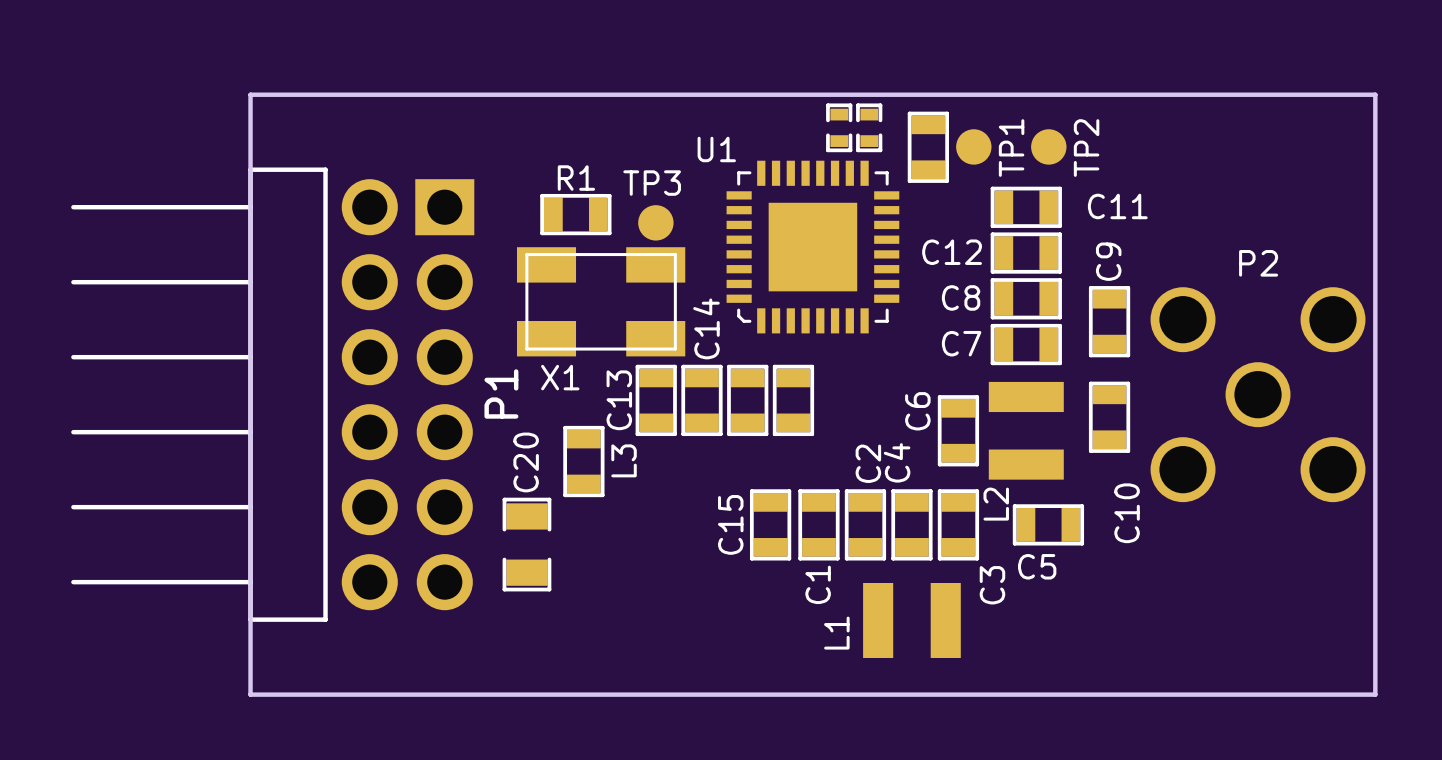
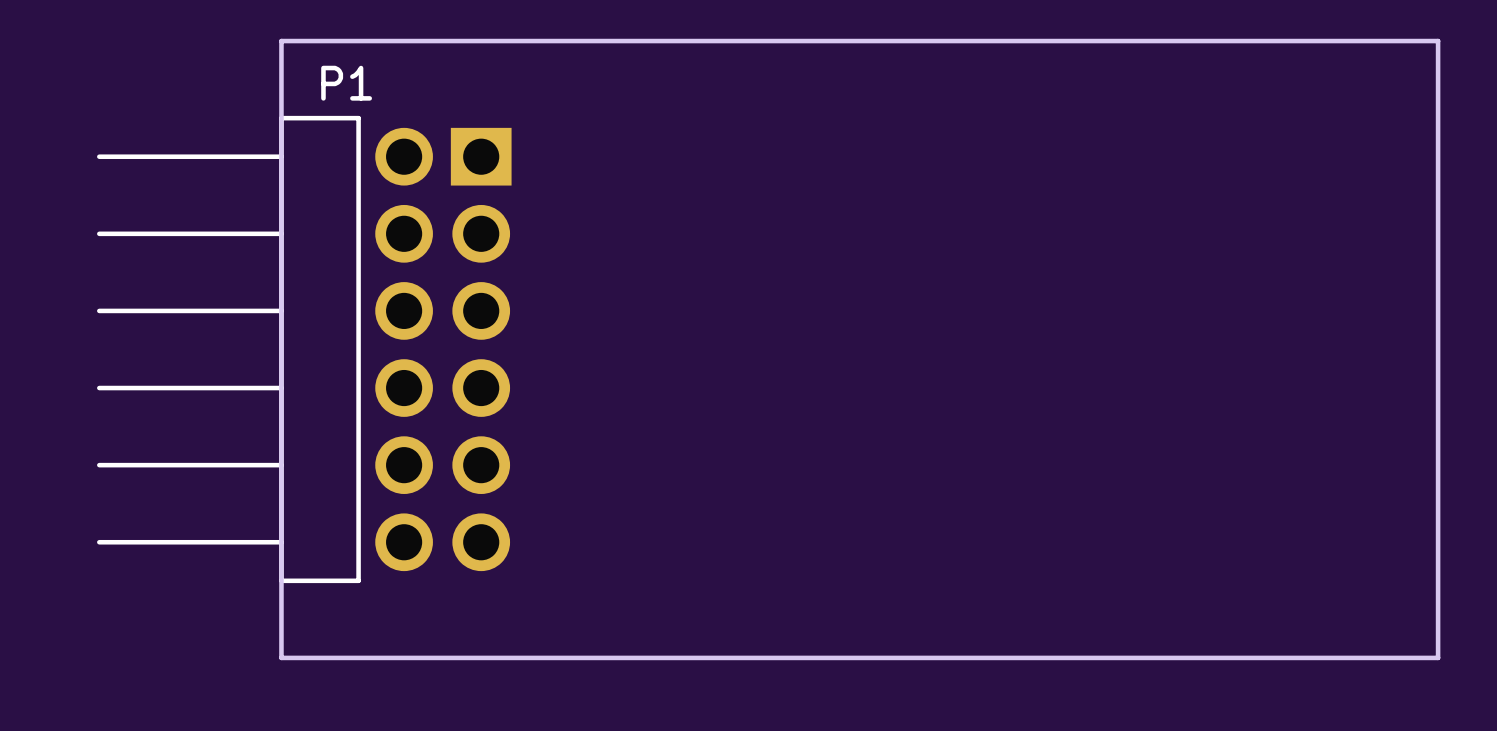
part: (839, 127) -> none
part: (869, 127) -> none
TP1: (973, 146) -> none
TP2: (1048, 146) -> none
part: (928, 147) -> none
C11: (1026, 207) -> none
R1: (575, 214) -> none
TP3: (655, 222) -> none
U1: (812, 247) -> none
C12: (1026, 253) -> none
C8: (1026, 298) -> none
X1: (601, 301) -> none
C9: (1109, 321) -> none
C7: (1026, 344) -> none
P1 name rotation: 0° (501, 393) -> 90° clockwise (346, 83)
P1 name position: P1 (501, 393) -> P1 (346, 83)
P2: (1258, 394) -> none
C13: (656, 400) -> none
C14: (701, 400) -> none
part: (747, 400) -> none
part: (793, 400) -> none
C10: (1109, 417) -> none
C6: (958, 430) -> none
L2: (1026, 430) -> none
L3: (583, 461) -> none
C15: (770, 524) -> none
C1: (818, 524) -> none
C2: (865, 524) -> none
C4: (911, 524) -> none
C3: (958, 524) -> none
C5: (1048, 524) -> none
C20: (526, 544) -> none
L1: (911, 620) -> none

